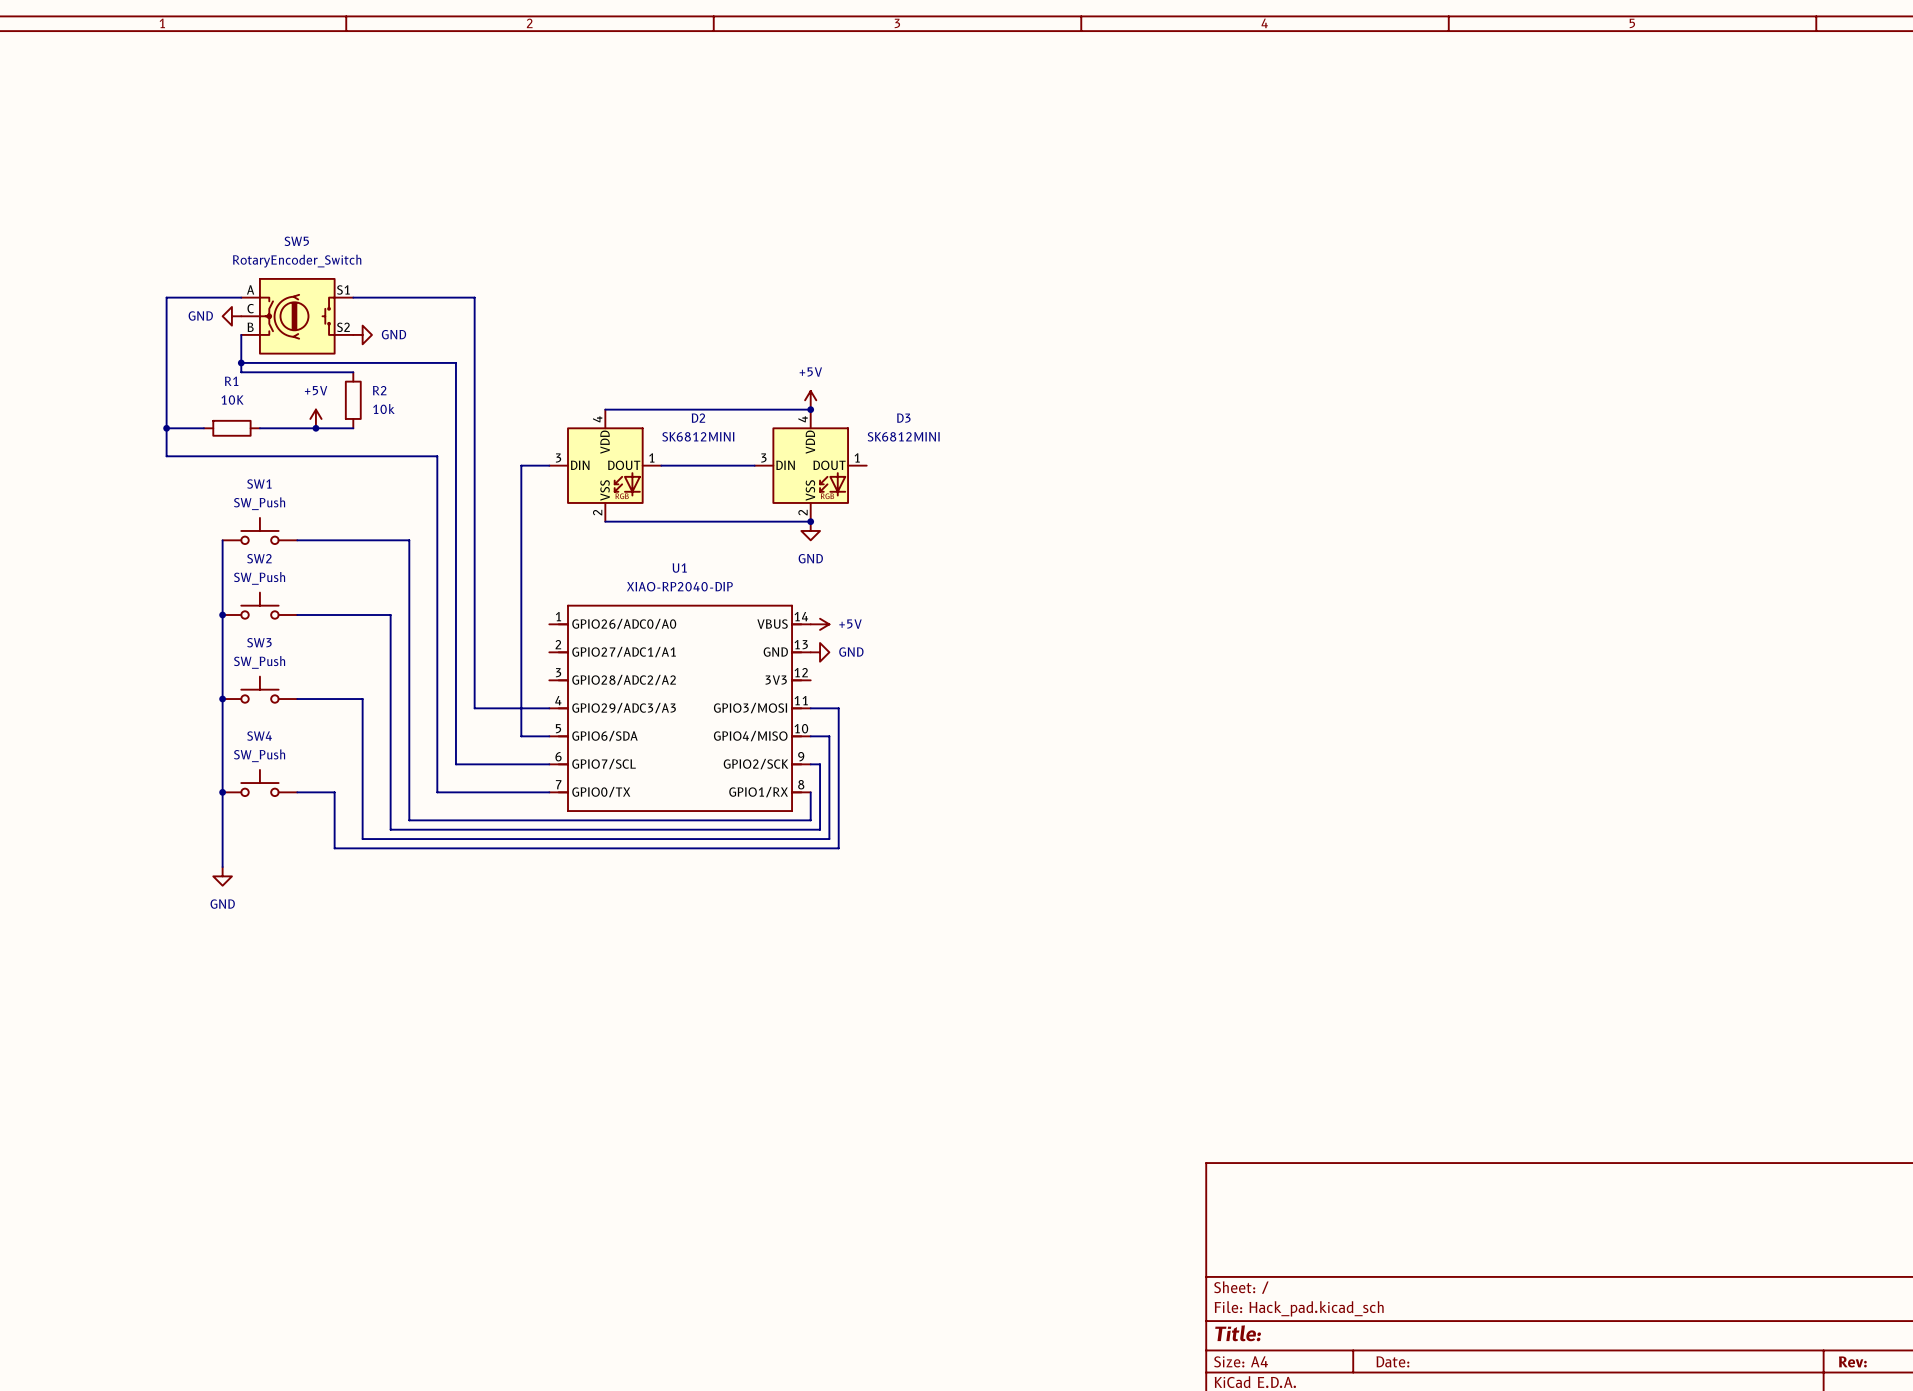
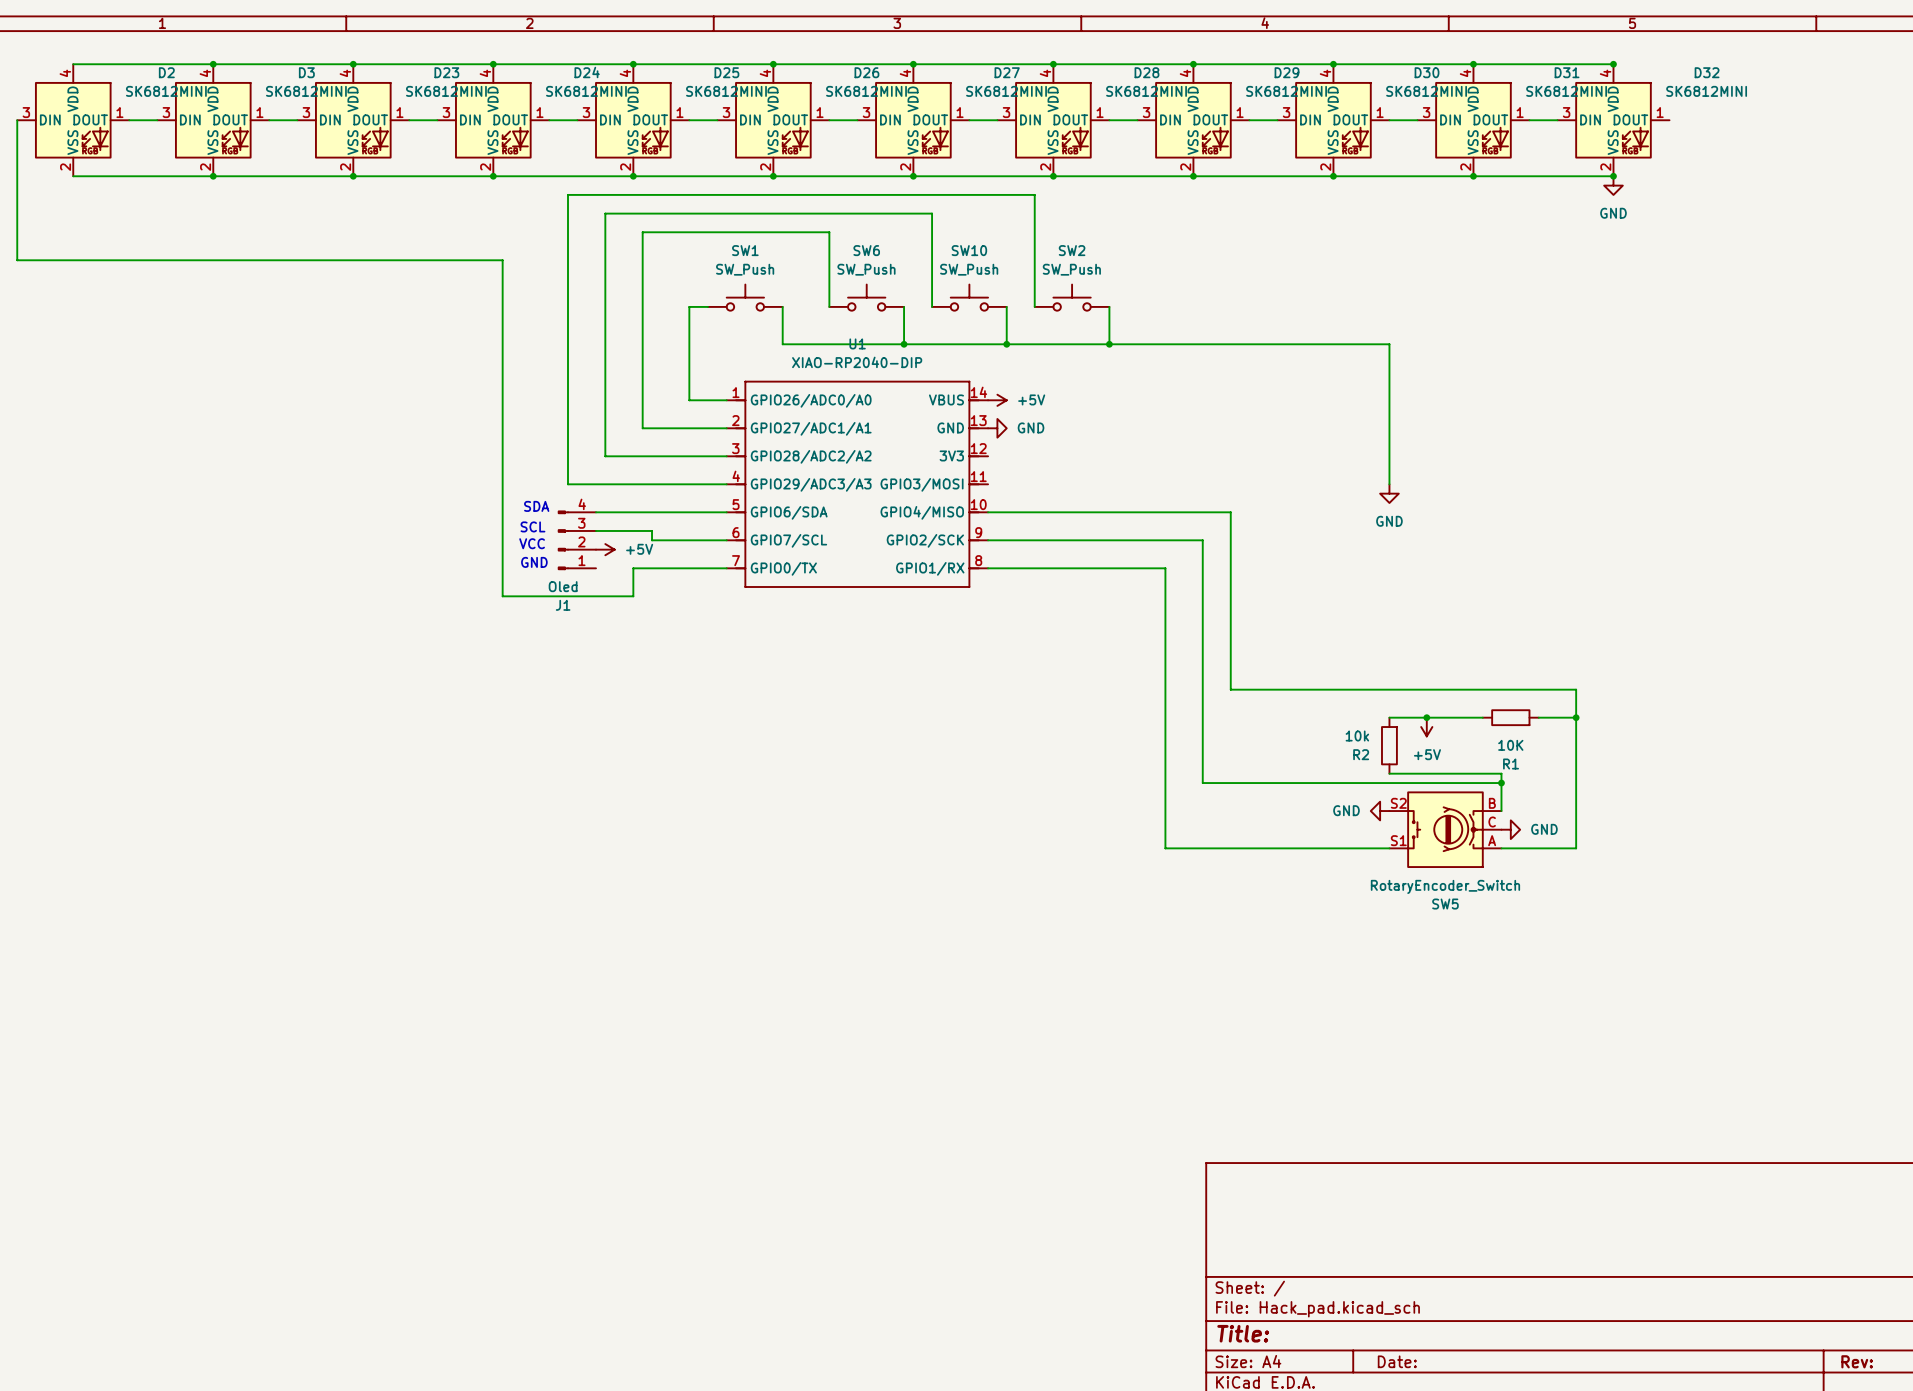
wire: none -> (73, 64) (1613, 64)
junction: none -> (213, 64)
junction: none -> (353, 64)
junction: none -> (493, 64)
junction: none -> (633, 64)
junction: none -> (773, 64)
junction: none -> (913, 64)
junction: none -> (1053, 64)
junction: none -> (1193, 64)
junction: none -> (1333, 64)
junction: none -> (1473, 64)
junction: none -> (1613, 64)
wire: none -> (17, 120) (17, 260) (502, 260) (502, 596) (633, 596) (633, 568) (726, 568)
wire: none -> (129, 120) (157, 120)
wire: none -> (269, 120) (297, 120)
D23: none -> SK6812MINI (353, 120)
wire: none -> (409, 120) (437, 120)
D24: none -> SK6812MINI (493, 120)
wire: none -> (549, 120) (577, 120)
D25: none -> SK6812MINI (633, 120)
wire: none -> (689, 120) (717, 120)
D26: none -> SK6812MINI (773, 120)
wire: none -> (829, 120) (857, 120)
D27: none -> SK6812MINI (913, 120)
wire: none -> (969, 120) (997, 120)
D28: none -> SK6812MINI (1053, 120)
wire: none -> (1109, 120) (1137, 120)
D29: none -> SK6812MINI (1193, 120)
wire: none -> (1249, 120) (1277, 120)
D30: none -> SK6812MINI (1333, 120)
wire: none -> (1389, 120) (1417, 120)
D31: none -> SK6812MINI (1473, 120)
wire: none -> (1529, 120) (1557, 120)
D32: none -> SK6812MINI (1613, 120)
wire: none -> (73, 176) (1613, 176)
junction: none -> (213, 176)
junction: none -> (353, 176)
junction: none -> (493, 176)
junction: none -> (633, 176)
junction: none -> (773, 176)
junction: none -> (913, 176)
junction: none -> (1053, 176)
junction: none -> (1193, 176)
junction: none -> (1333, 176)
junction: none -> (1473, 176)
junction: none -> (1613, 176)
power symbol: none -> GND (1613, 185)
wire: (241, 297) (166, 297) (166, 456) (437, 456) (437, 792) (549, 792) -> none
wire: (353, 297) (474, 297) (474, 708) (549, 708) -> none
SW6: none -> SW_Push (866, 297)
SW10: none -> SW_Push (969, 297)
wire: none -> (708, 306) (689, 306) (689, 400) (726, 400)
wire: none -> (782, 306) (782, 344) (1389, 344) (1389, 484)
wire: none -> (829, 306) (829, 232) (642, 232) (642, 428) (726, 428)
wire: none -> (904, 306) (904, 344)
wire: none -> (932, 306) (932, 213) (605, 213) (605, 456) (726, 456)
wire: none -> (1006, 306) (1006, 344)
wire: none -> (1034, 306) (1034, 194) (568, 194) (568, 484) (726, 484)
wire: none -> (1109, 306) (1109, 344)
power symbol: GND (231, 316) -> none
SW5 rotation: 0° (297, 316) -> 180° (1445, 829)
SW5 position: (297, 316) -> (1445, 829)
wire: (241, 334) (241, 372) (353, 372) -> none
power symbol: GND (362, 334) -> none
junction: none -> (904, 344)
junction: none -> (1006, 344)
junction: none -> (1109, 344)
wire: (241, 362) (455, 362) (455, 764) (549, 764) -> none
junction: (241, 362) -> none
R1 name position: R1 (231, 381) -> R1 (1511, 764)
R2 name position: R2 (379, 390) -> R2 (1361, 754)
R1 value position: 10K (232, 400) -> 10K (1510, 745)
R2 position: (353, 400) -> (1389, 745)
power symbol: +5V (810, 400) -> none
power symbol: none -> +5V (997, 400)
R2 value position: 10k (383, 409) -> 10k (1357, 736)
wire: (605, 409) (810, 409) -> none
junction: (810, 409) -> none
power symbol: +5V (315, 418) -> none
wire: (166, 428) (203, 428) -> none
junction: (166, 428) -> none
R1 position: (231, 428) -> (1510, 717)
wire: (259, 428) (353, 428) -> none
junction: (315, 428) -> none
power symbol: none -> GND (997, 428)
wire: (549, 465) (521, 465) (521, 736) (549, 736) -> none
D2 position: (605, 465) -> (73, 120)
wire: (661, 465) (754, 465) -> none
D3 position: (810, 465) -> (213, 120)
power symbol: none -> GND (1389, 493)
text: none -> SDA (536, 506)
wire: none -> (596, 512) (726, 512)
wire: none -> (988, 512) (1230, 512) (1230, 689) (1576, 689) (1576, 848) (1501, 848)
wire: (605, 521) (810, 521) -> none
junction: (810, 521) -> none
text: none -> SCL (532, 526)
SW1 position: (259, 530) -> (745, 297)
wire: none -> (596, 530) (652, 530) (652, 540) (726, 540)
power symbol: GND (810, 530) -> none
wire: (222, 540) (222, 867) -> none
wire: (297, 540) (409, 540) (409, 820) (810, 820) (810, 792) -> none
J1: none -> Oled (577, 540)
wire: none -> (988, 540) (1202, 540) (1202, 783) (1501, 783)
text: none -> VCC (532, 543)
power symbol: none -> +5V (605, 549)
text: none -> GND (534, 562)
wire: none -> (988, 568) (1165, 568) (1165, 848) (1389, 848)
SW2 position: (259, 605) -> (1072, 297)
junction: (222, 615) -> none
wire: (297, 615) (390, 615) (390, 829) (820, 829) (820, 764) (810, 764) -> none
power symbol: +5V (820, 624) -> none
power symbol: GND (820, 652) -> none
SW3: SW_Push (259, 689) -> none
junction: (222, 699) -> none
wire: (297, 699) (362, 699) (362, 839) (829, 839) (829, 736) (810, 736) -> none
U1 position: (680, 708) -> (857, 484)
wire: (810, 708) (838, 708) (838, 848) (334, 848) (334, 792) (297, 792) -> none
wire: none -> (1389, 717) (1482, 717)
junction: none -> (1426, 717)
wire: none -> (1538, 717) (1576, 717)
junction: none -> (1576, 717)
power symbol: none -> +5V (1426, 727)
wire: none -> (1389, 773) (1501, 773) (1501, 811)
SW4: SW_Push (259, 783) -> none
junction: none -> (1501, 783)
junction: (222, 792) -> none
power symbol: none -> GND (1380, 811)
power symbol: none -> GND (1510, 829)
power symbol: GND (222, 876) -> none

